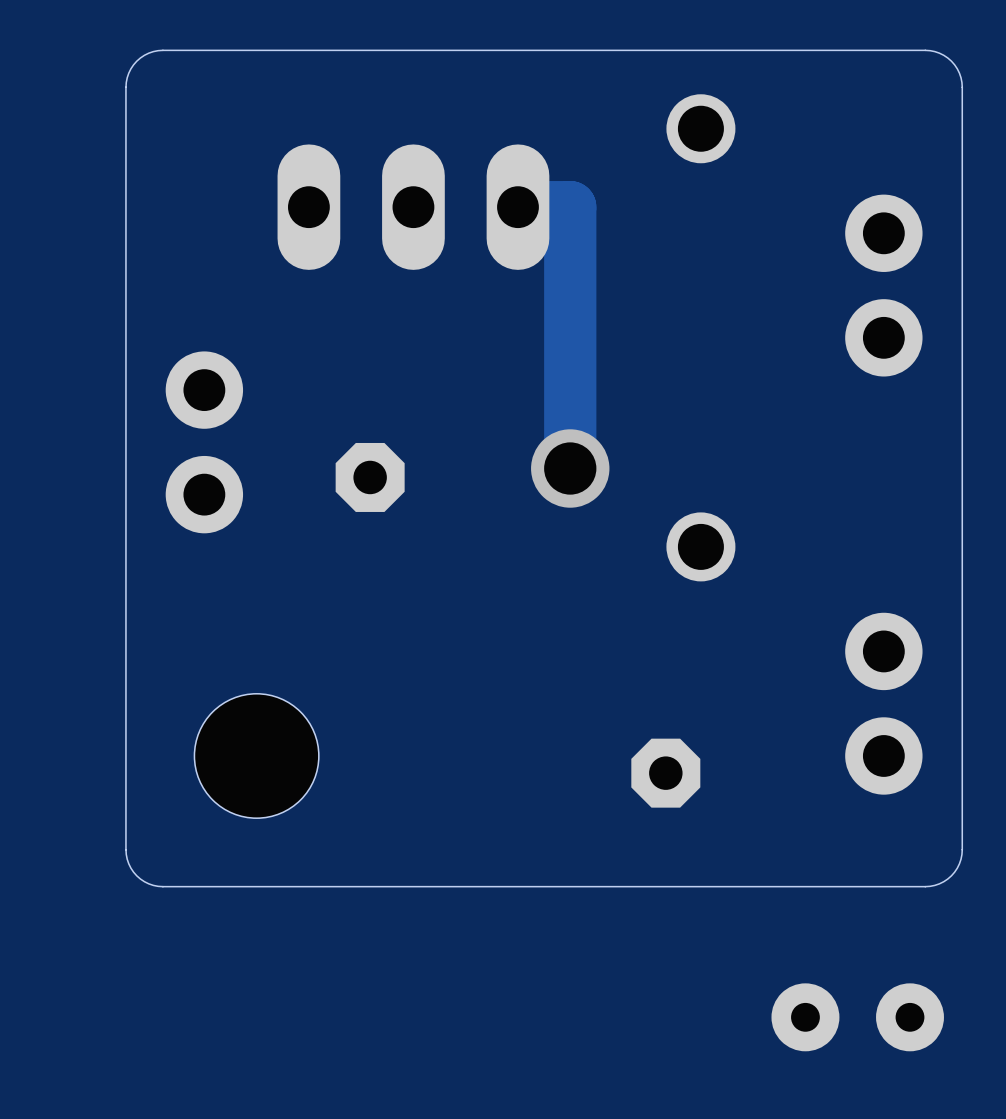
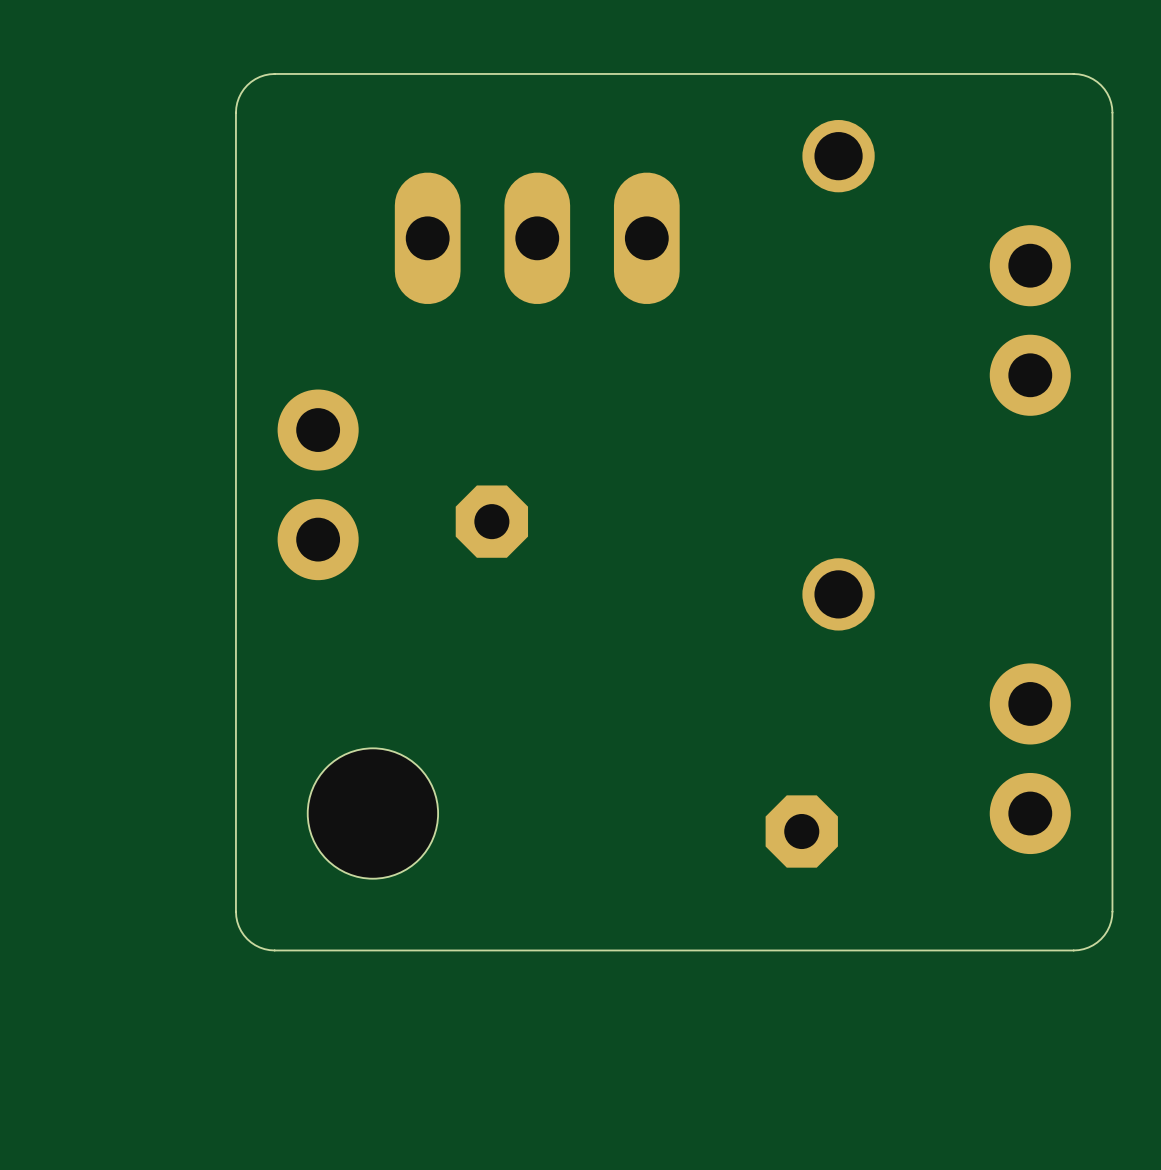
track: (517, 207) (570, 207) (570, 468) -> none
via: (570, 468) -> none
part: (857, 1017) -> none

